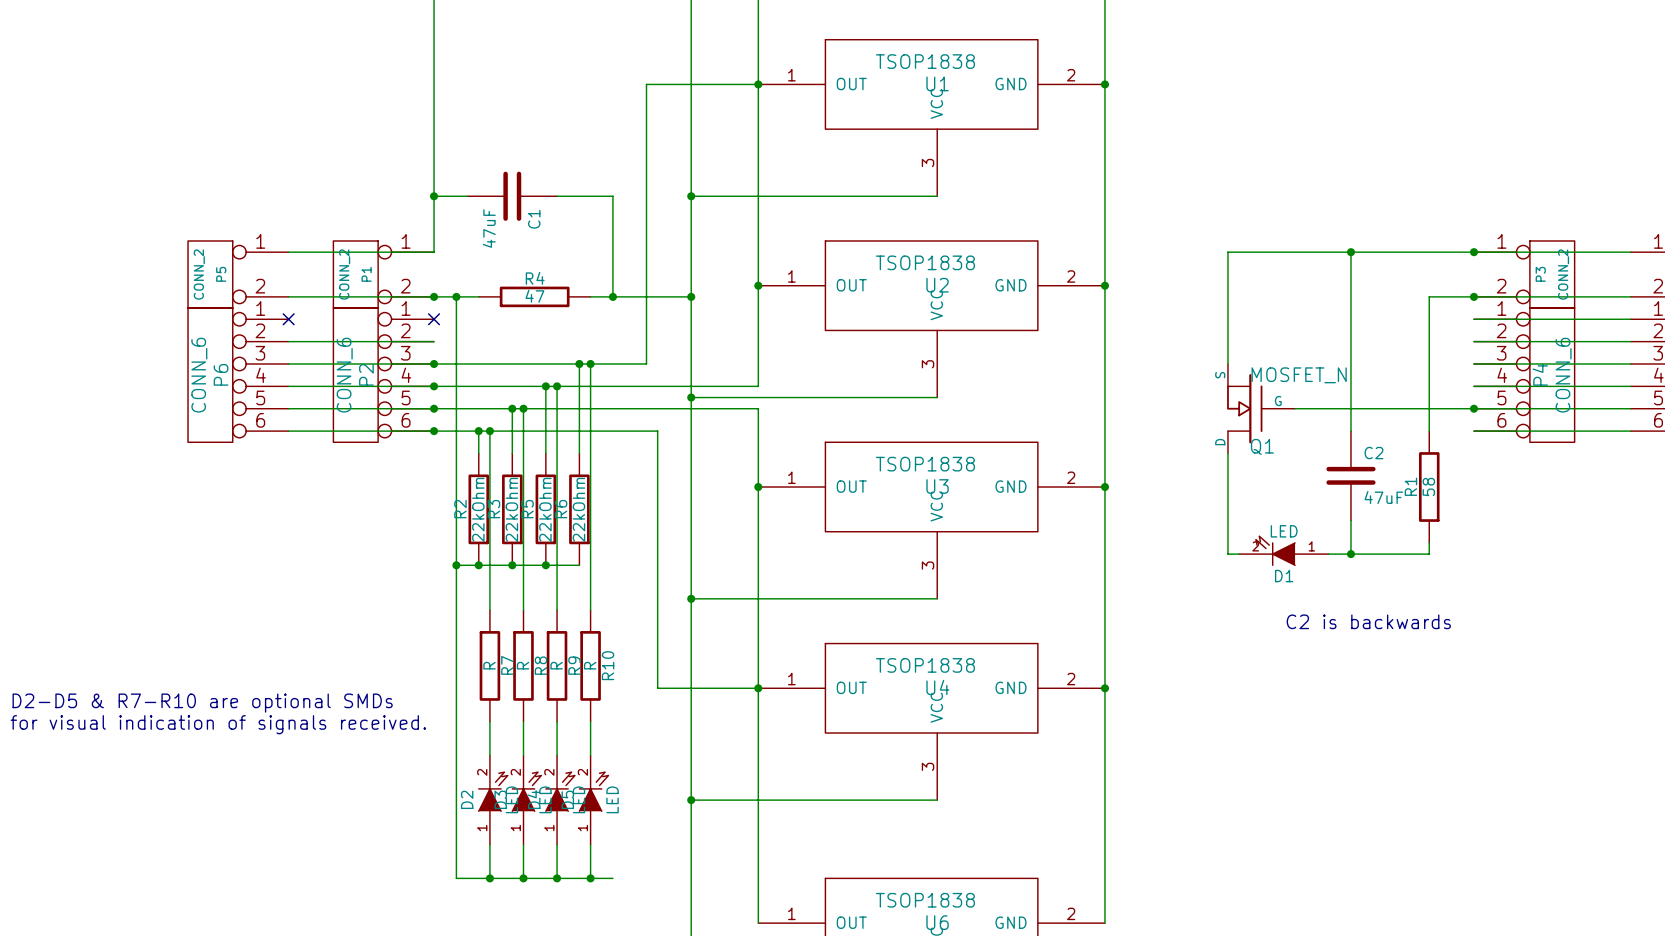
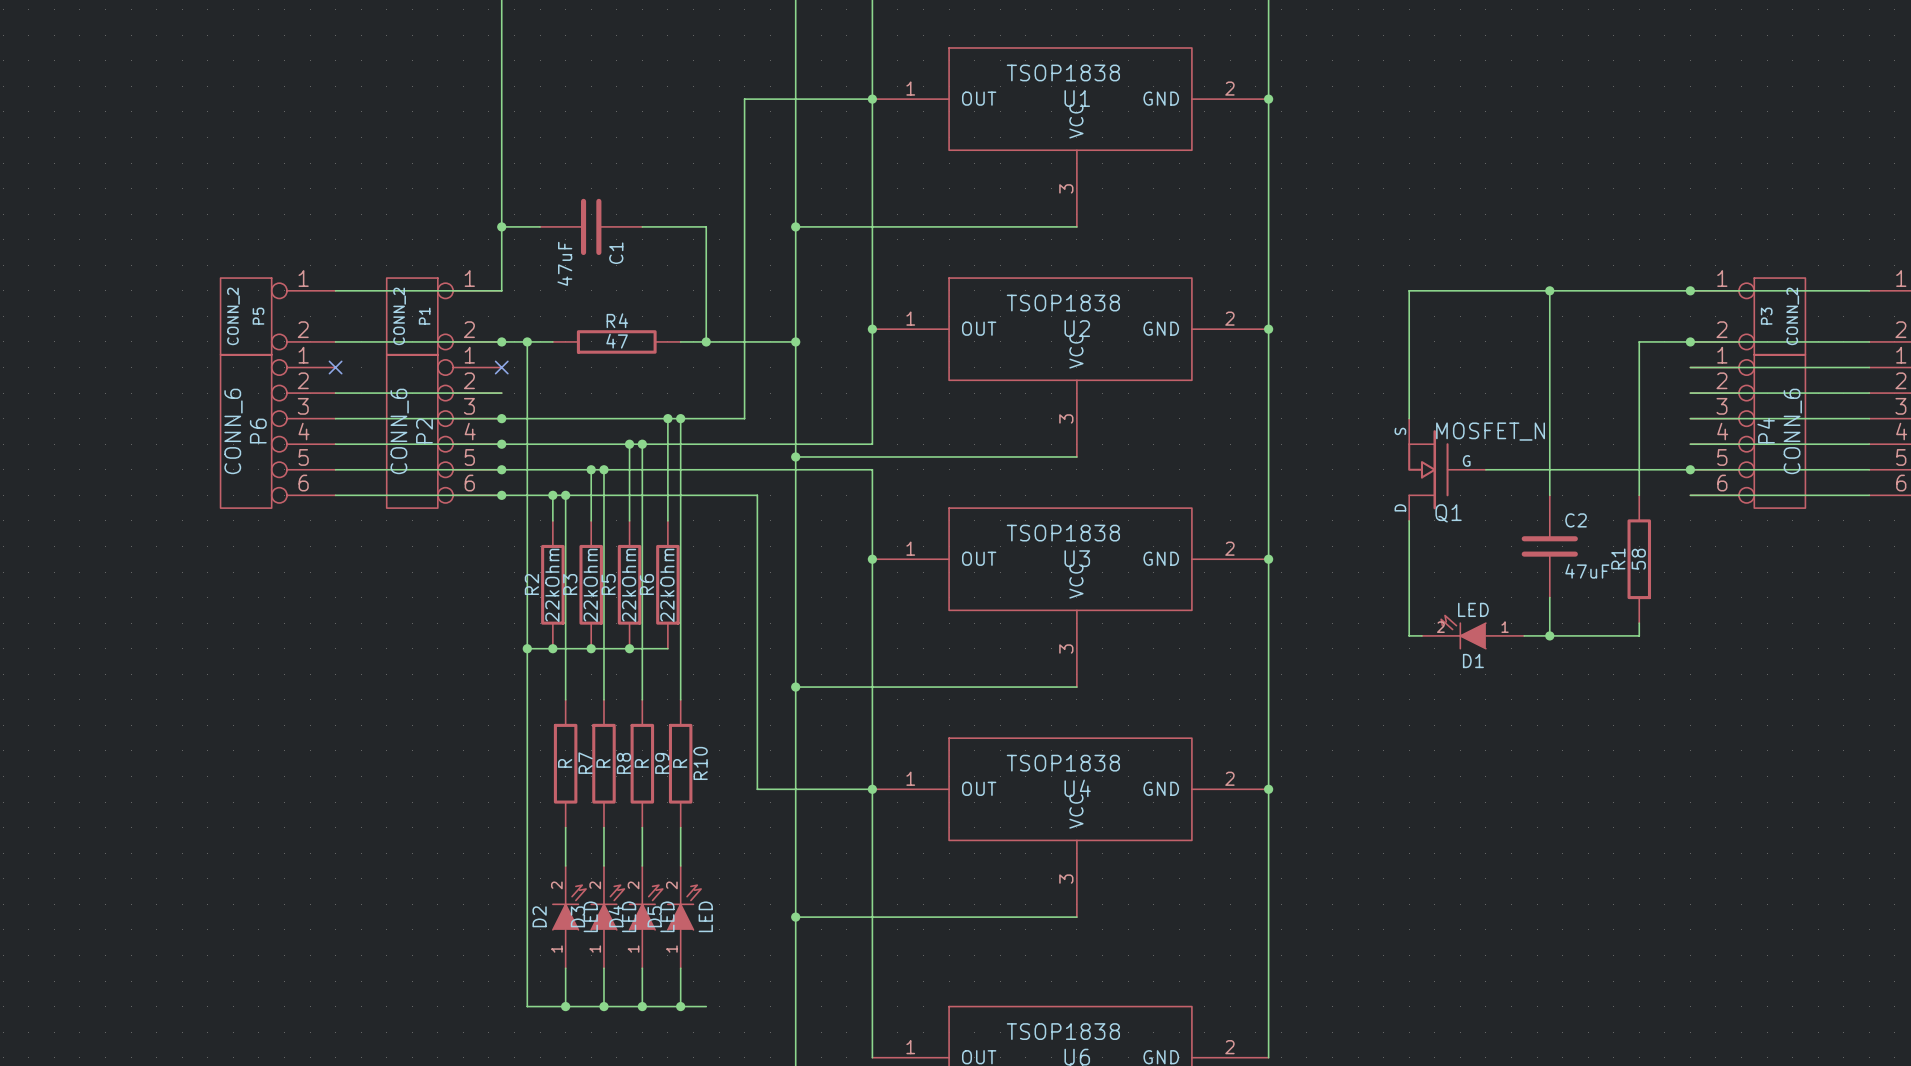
text: C2 is backwards (1368, 621) -> none
text: D2-D5 & R7-R10 are optional SMDs (202, 703) -> none
text: for visual indication of signals received. (218, 724) -> none

